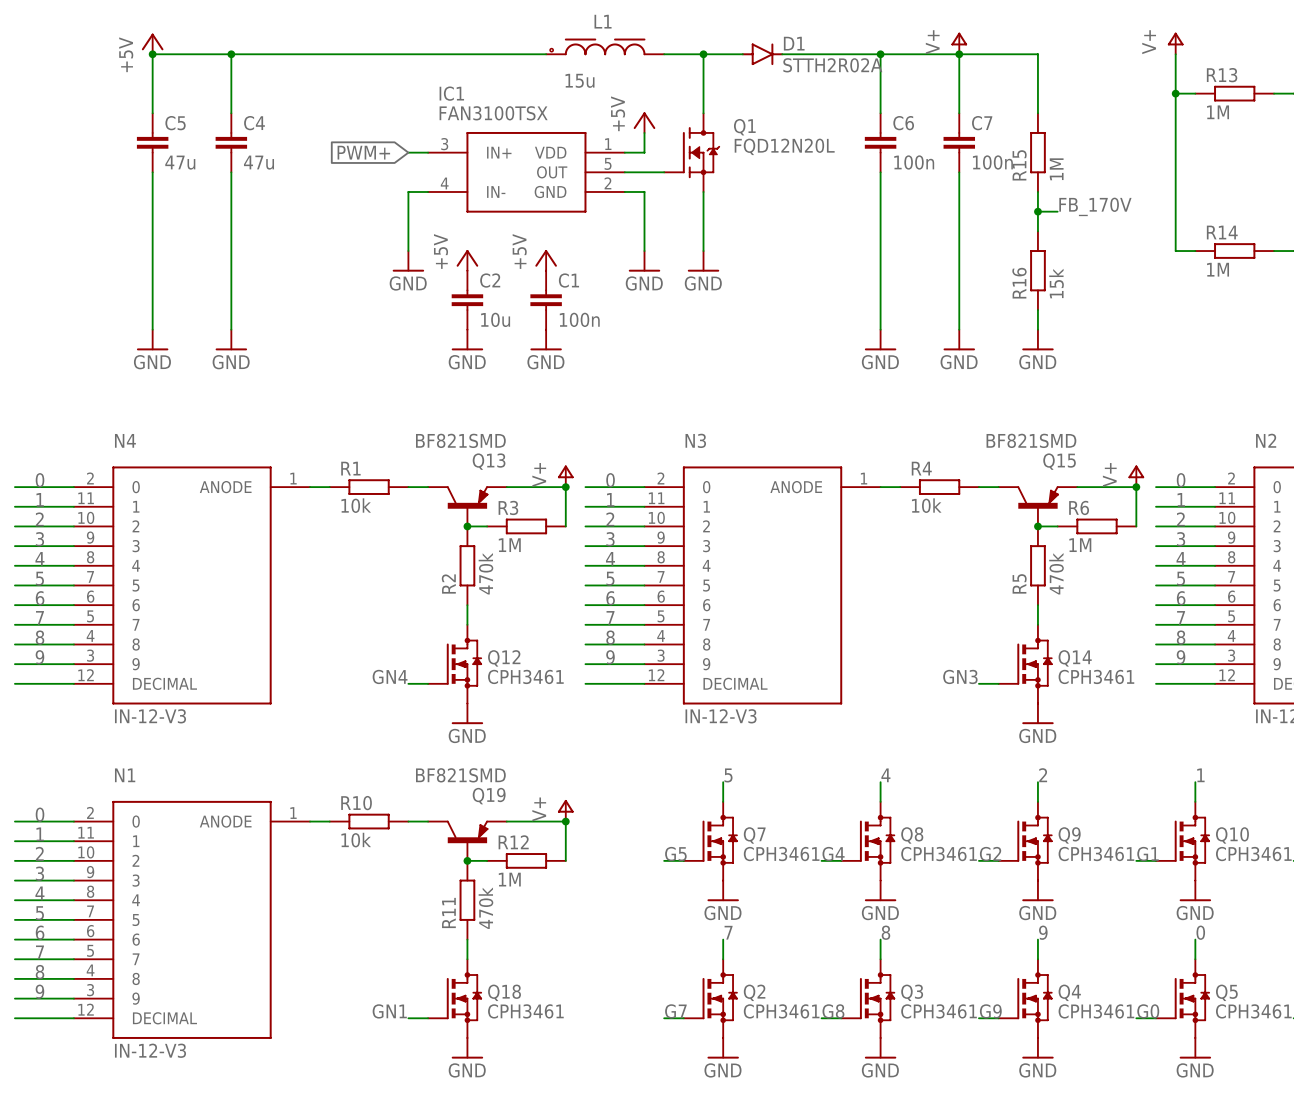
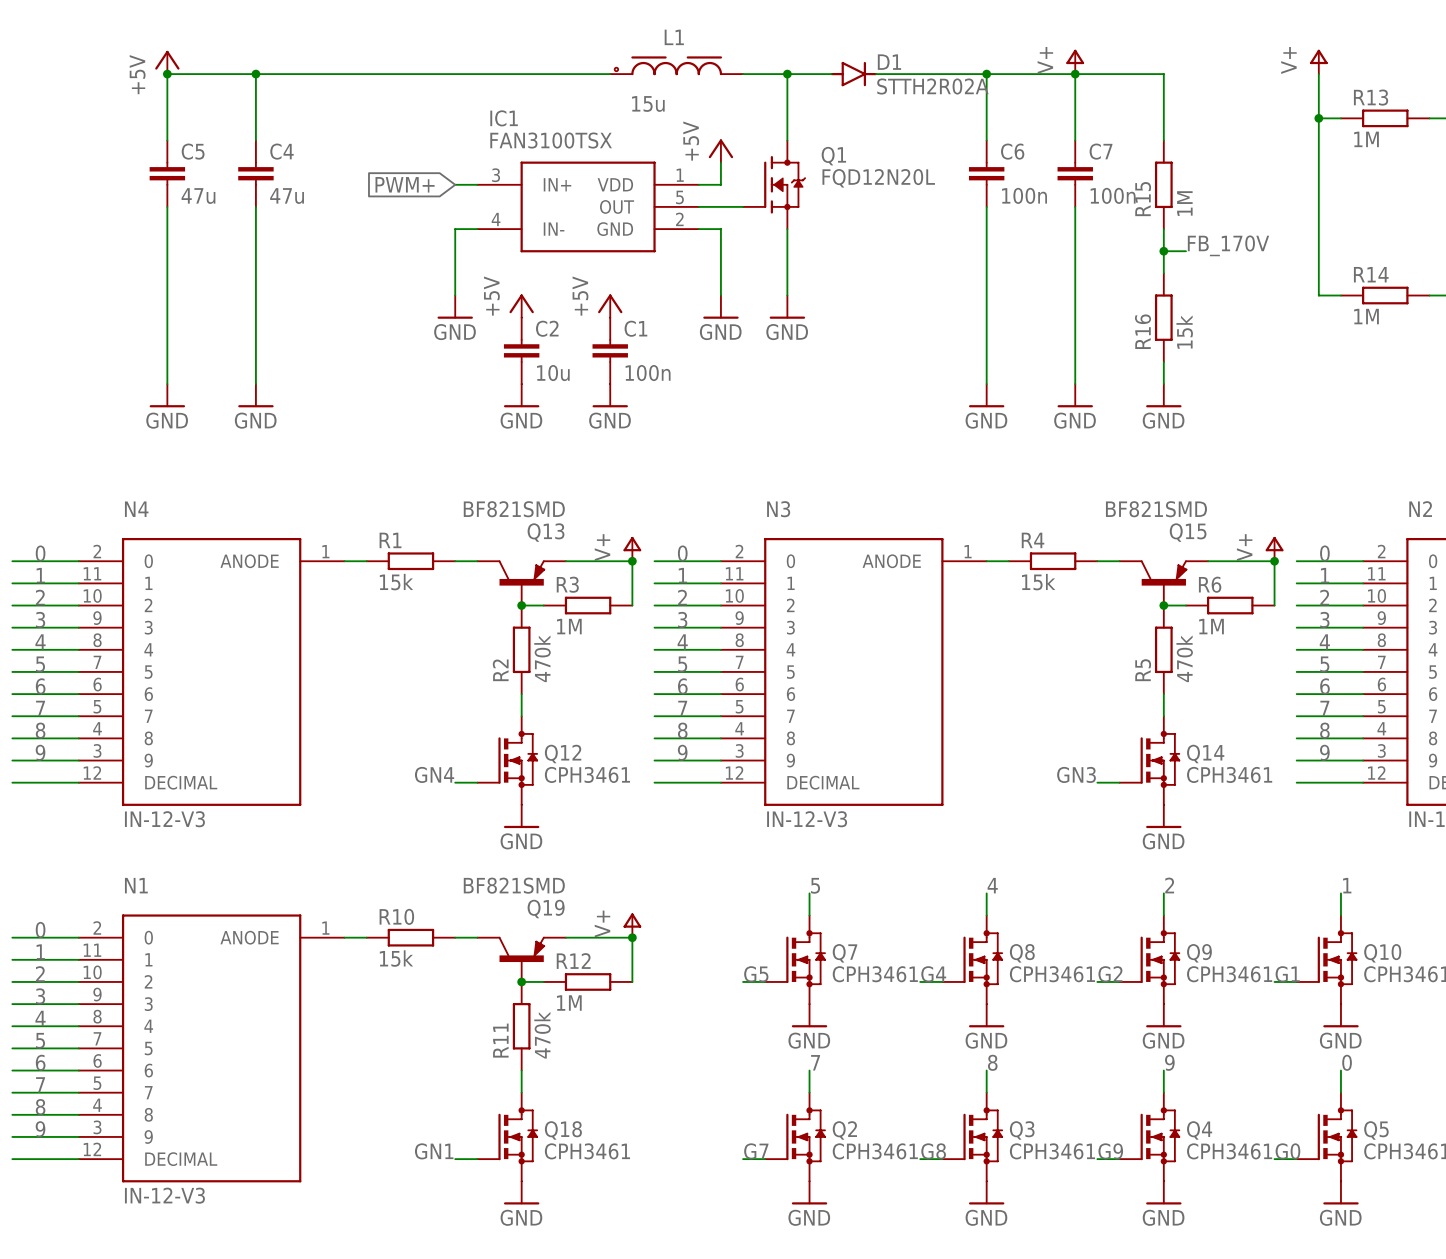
R1 value: 10k (356, 505) -> 15k (396, 582)
R4 value: 10k (926, 505) -> 15k (1038, 582)
R10 value: 10k (356, 840) -> 15k (396, 958)

